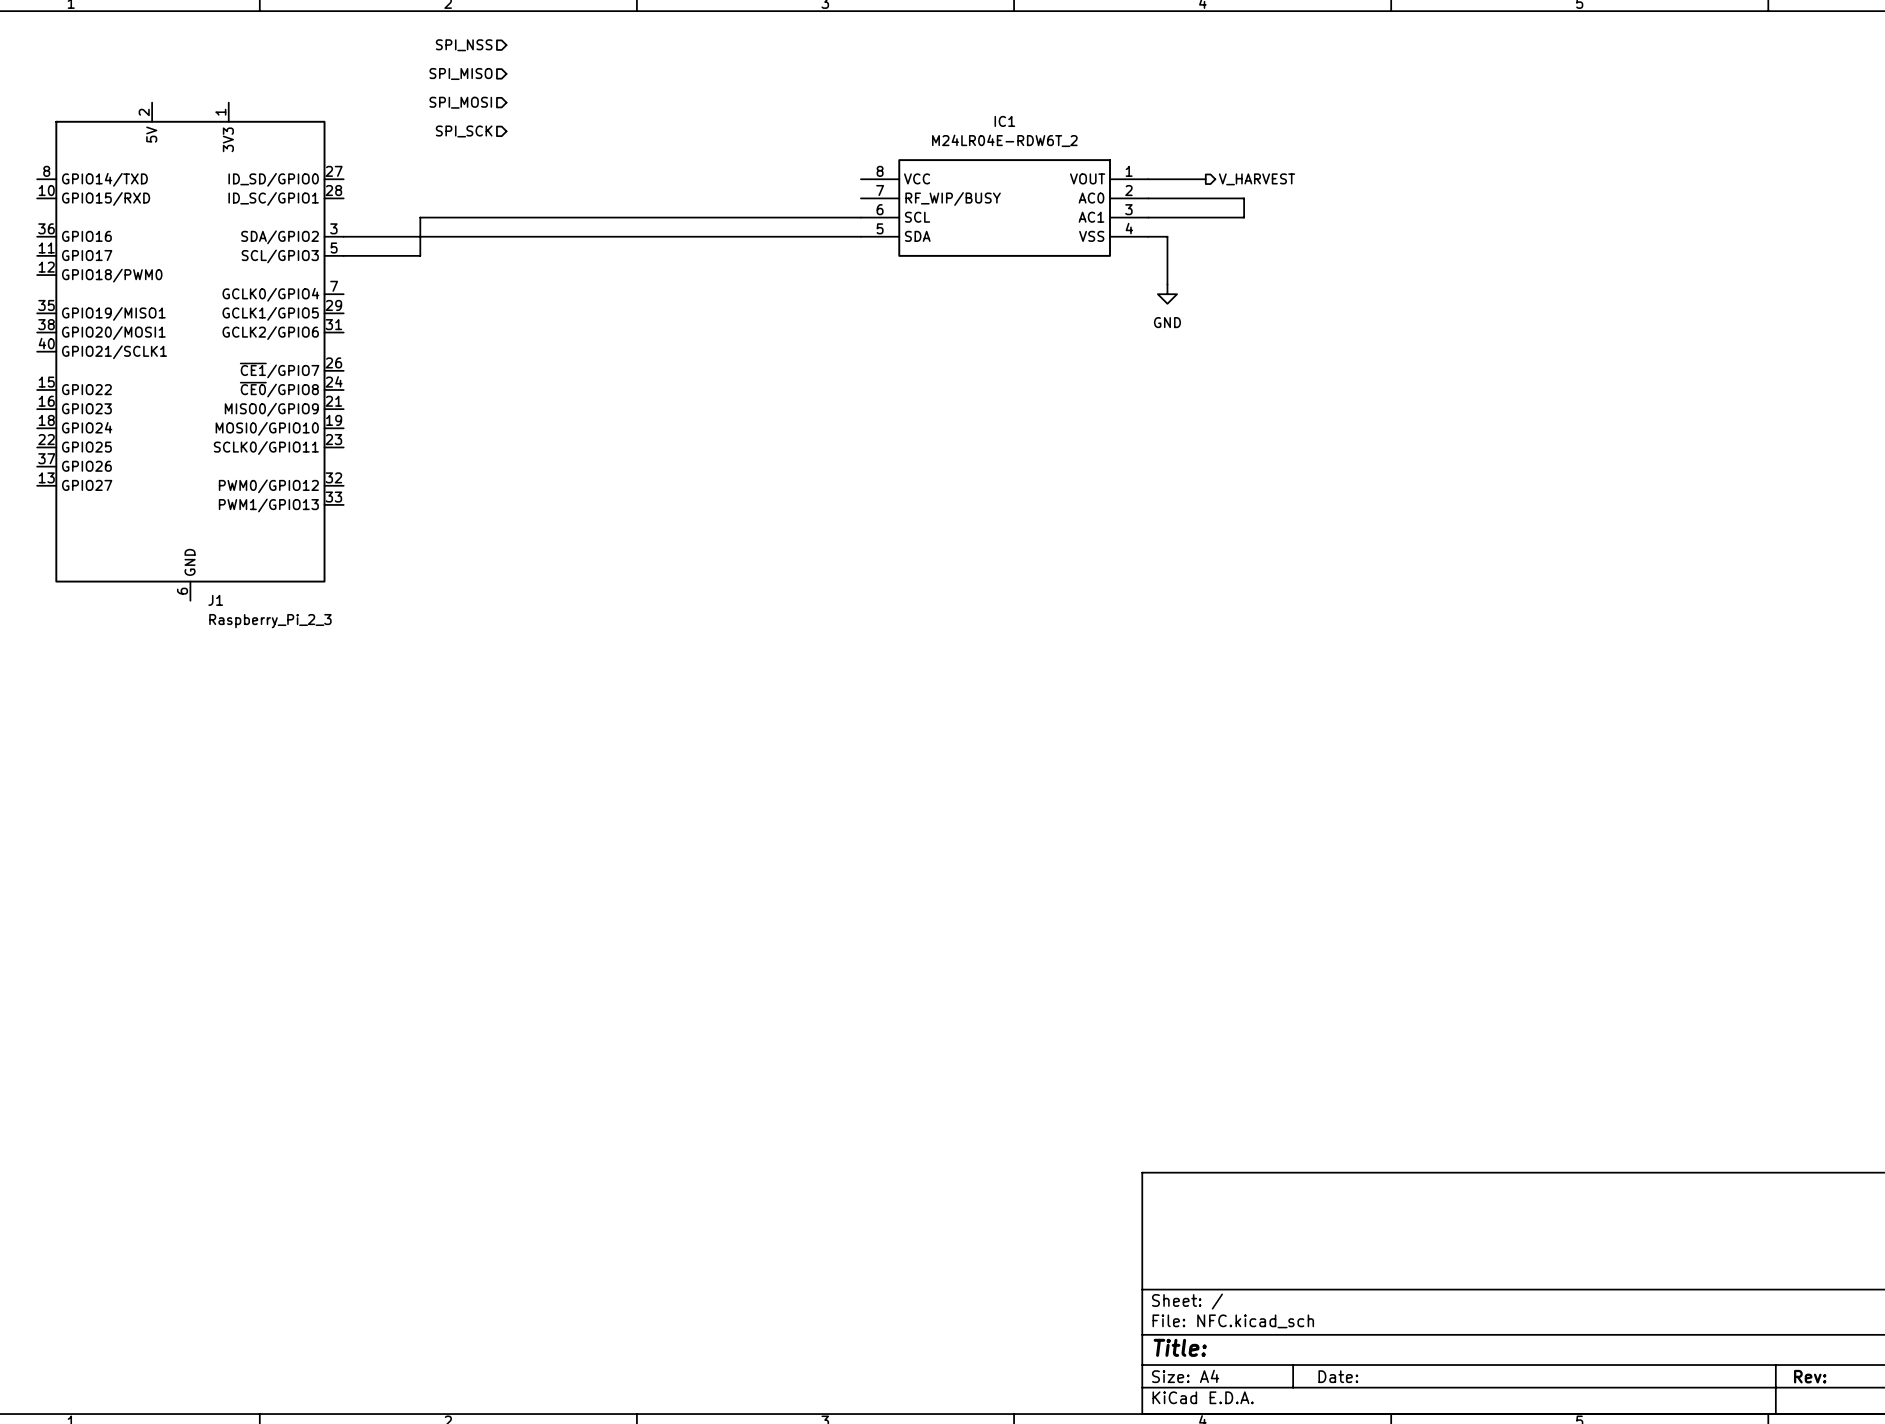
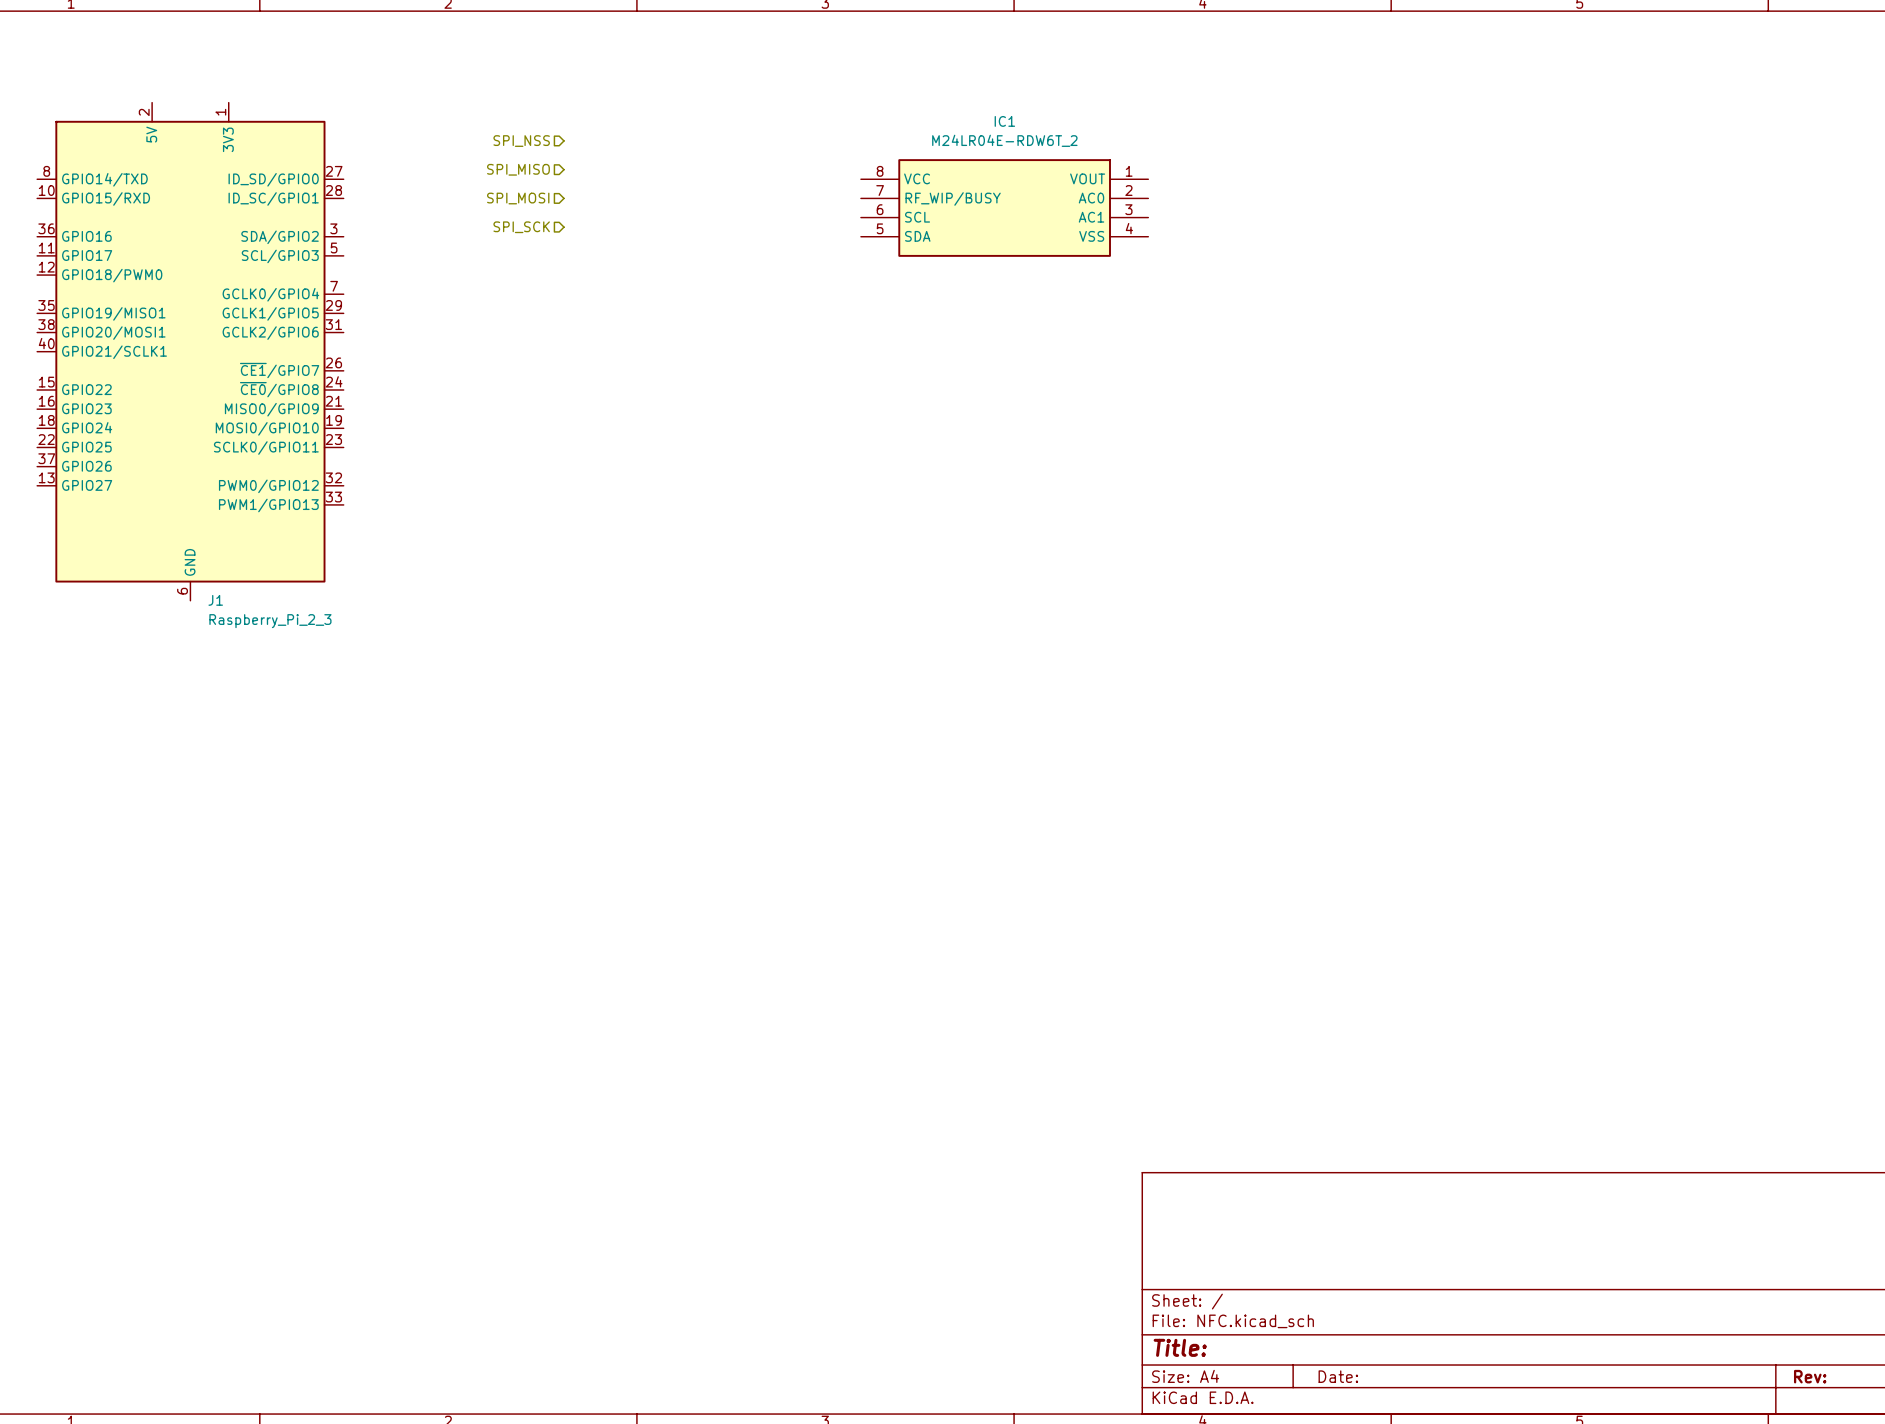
hierarchical label position: SPI_NSS (464, 45) -> SPI_NSS (521, 141)
hierarchical label position: SPI_MISO (460, 73) -> SPI_MISO (518, 169)
hierarchical label position: SPI_MOSI (460, 102) -> SPI_MOSI (518, 198)
hierarchical label position: SPI_SCK (464, 131) -> SPI_SCK (521, 227)
wire: (1148, 179) (1205, 179) -> none
hierarchical label: V_HARVEST (1257, 179) -> none
wire: (1148, 198) (1244, 198) (1244, 217) (1148, 217) -> none
wire: (860, 217) (420, 217) (420, 255) (343, 255) -> none
wire: (343, 236) (860, 236) -> none
wire: (1148, 236) (1167, 236) (1167, 284) -> none
power symbol: GND (1167, 294) -> none

